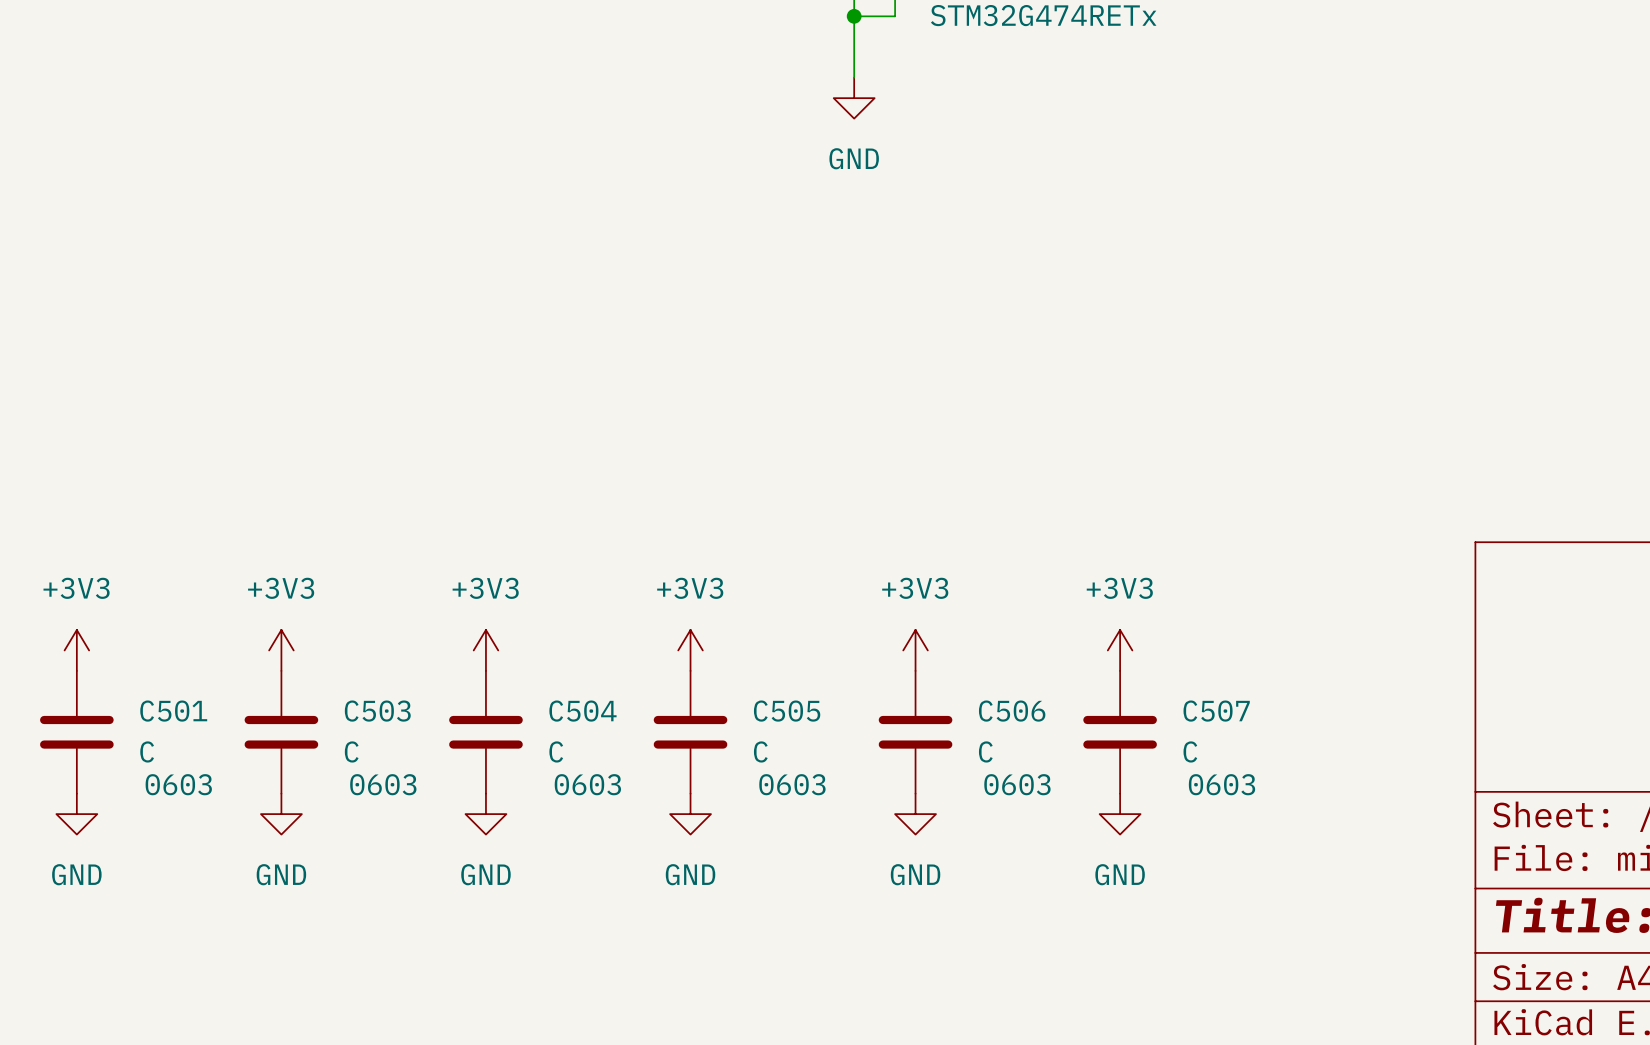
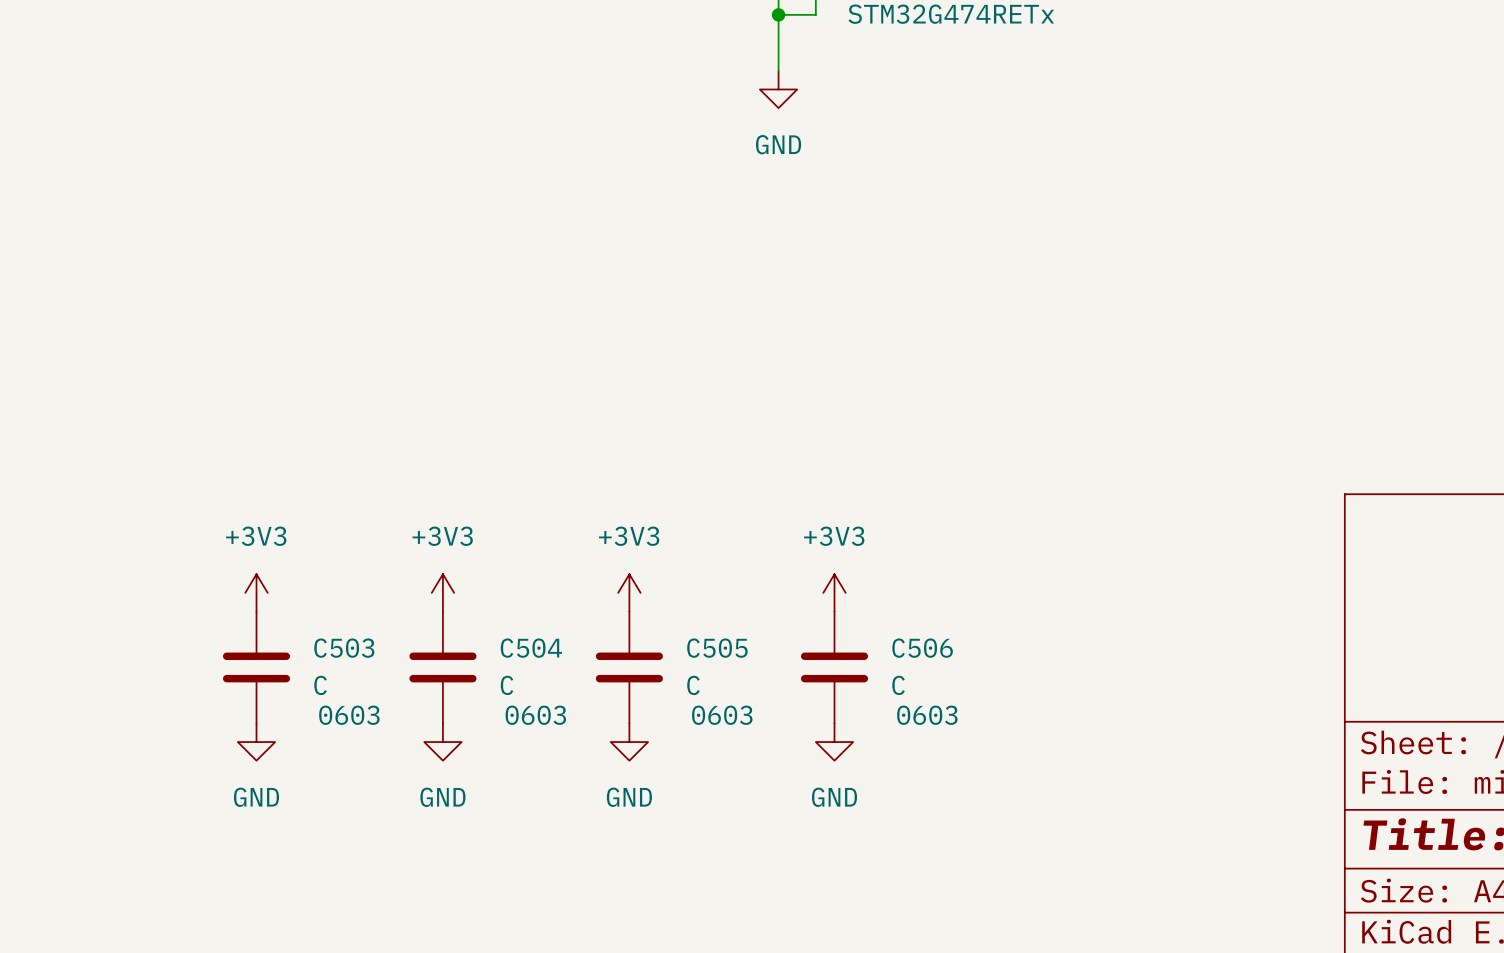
power symbol: +3V3 (76, 650) -> none
power symbol: +3V3 (1120, 650) -> none
C501: C (76, 732) -> none
C507: C (1120, 732) -> none
power symbol: GND (76, 814) -> none
power symbol: GND (1120, 814) -> none

